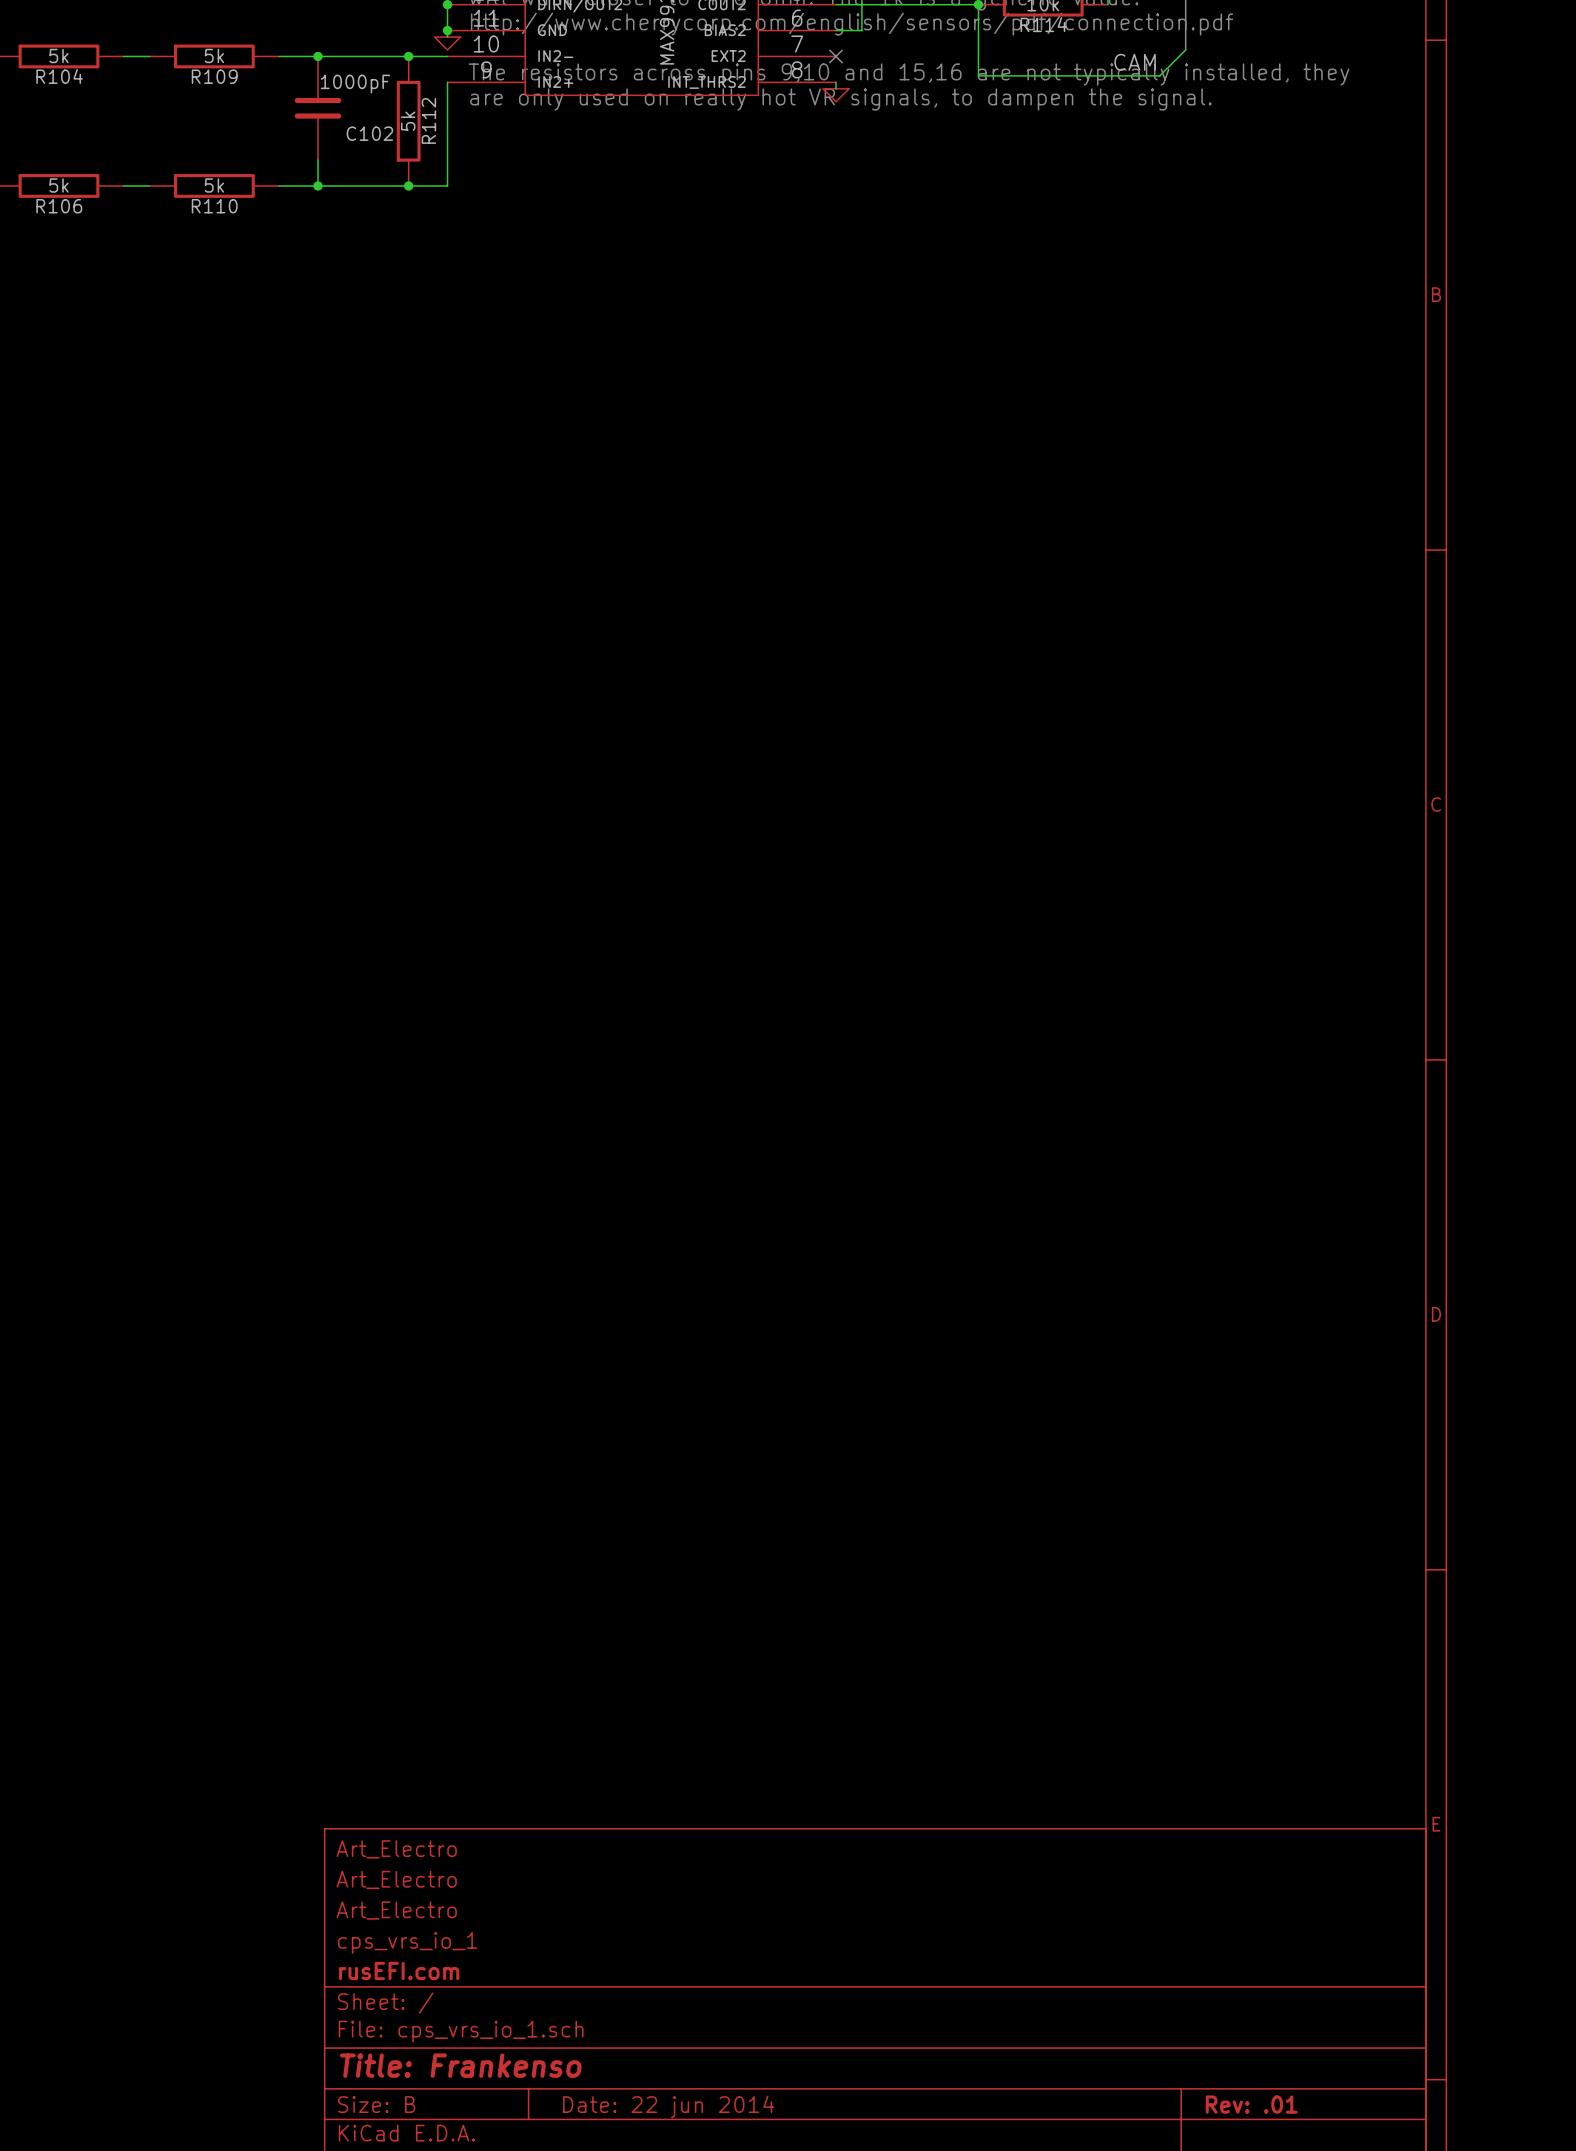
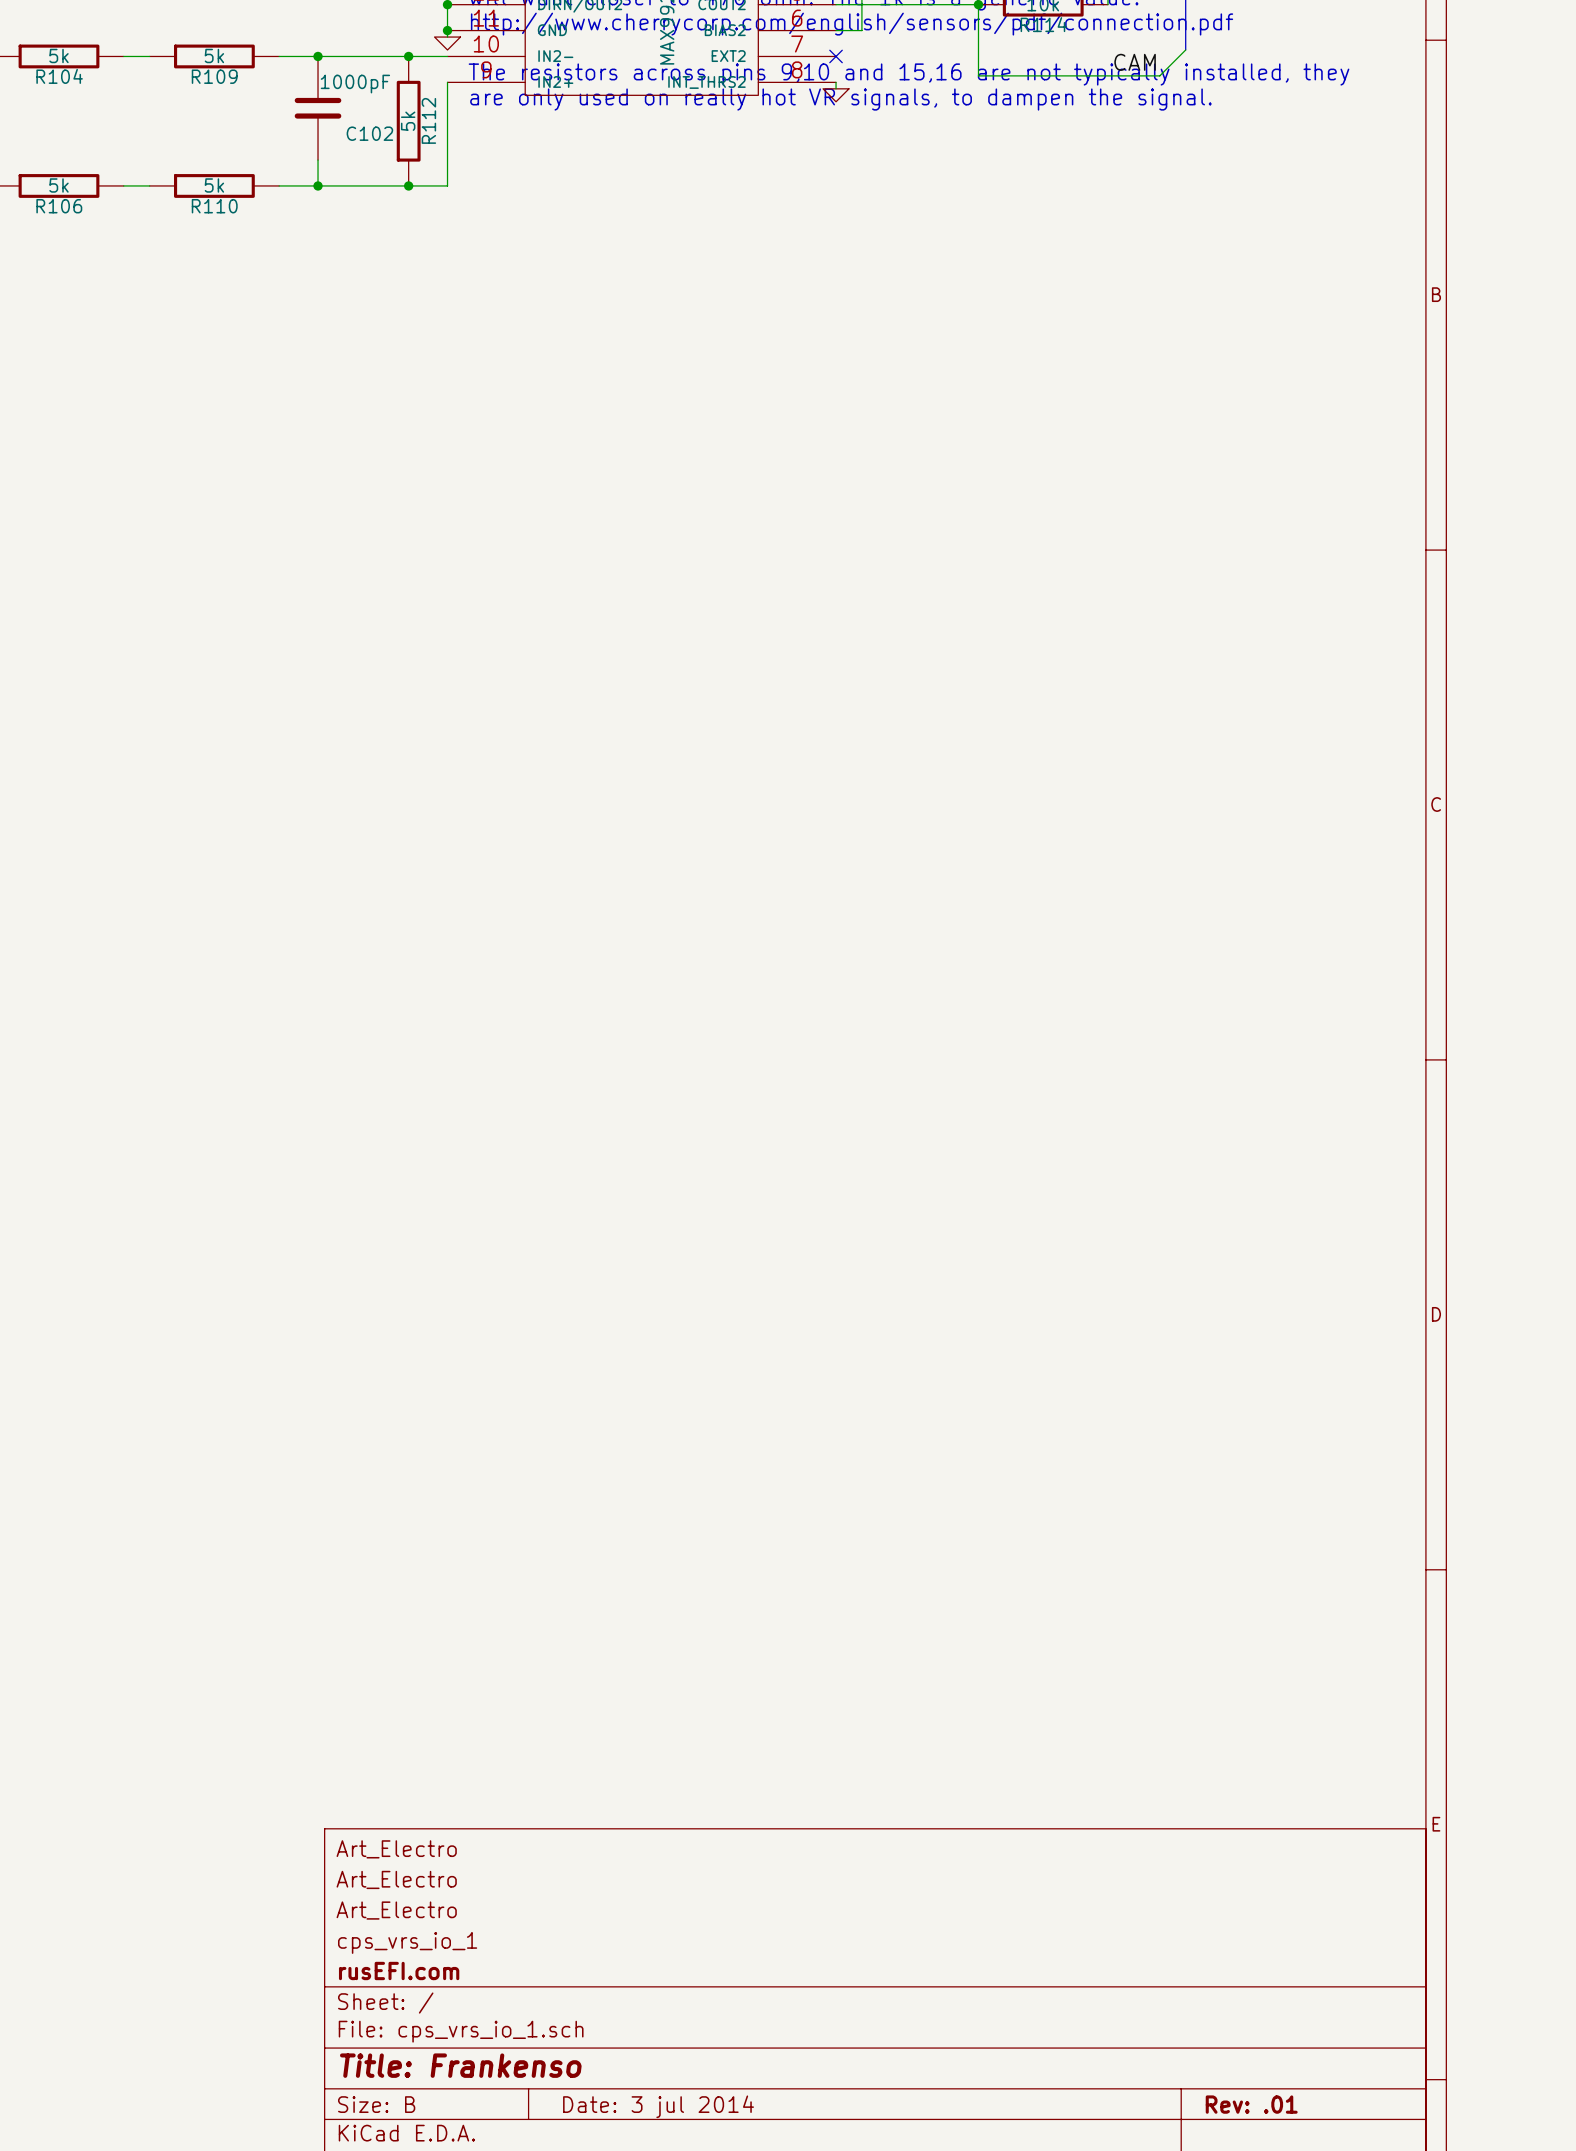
title block: Date: 22 jun 2014 (668, 2106) -> Date: 3 jul 2014 (658, 2106)

